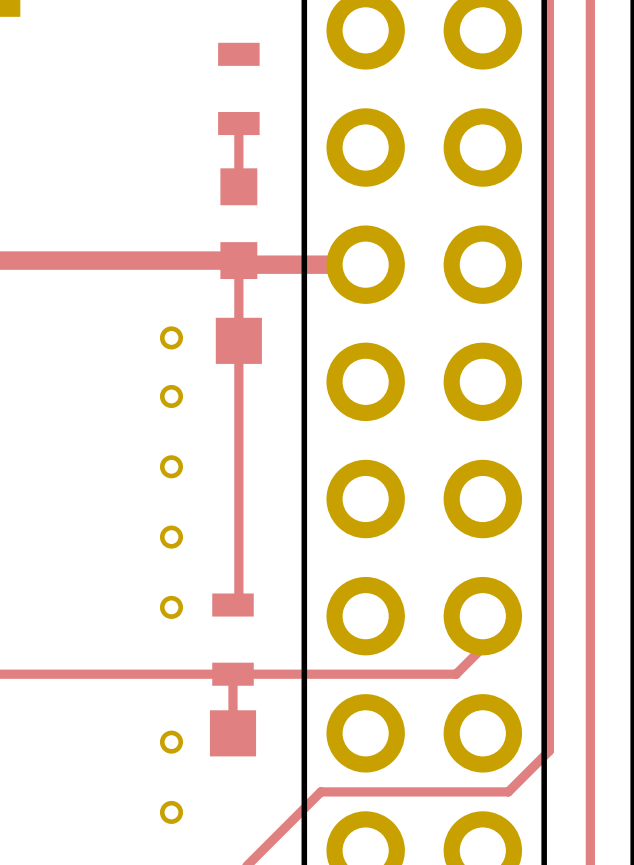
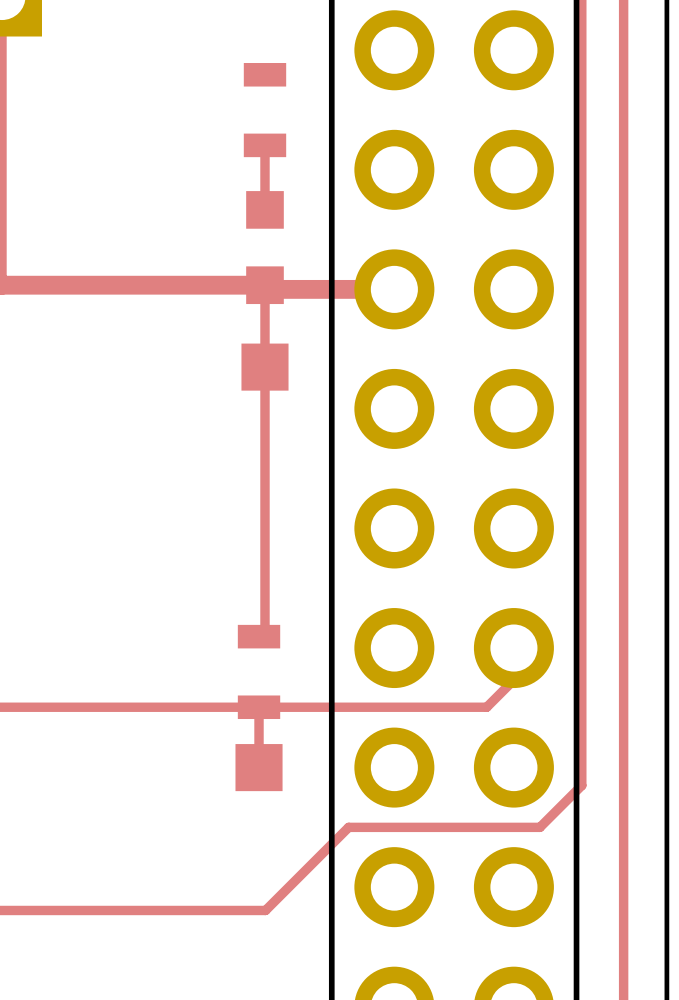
part: (171, 337) -> none
part: (171, 396) -> none
part: (171, 466) -> none
part: (171, 537) -> none
part: (171, 607) -> none
part: (171, 742) -> none
part: (171, 812) -> none

